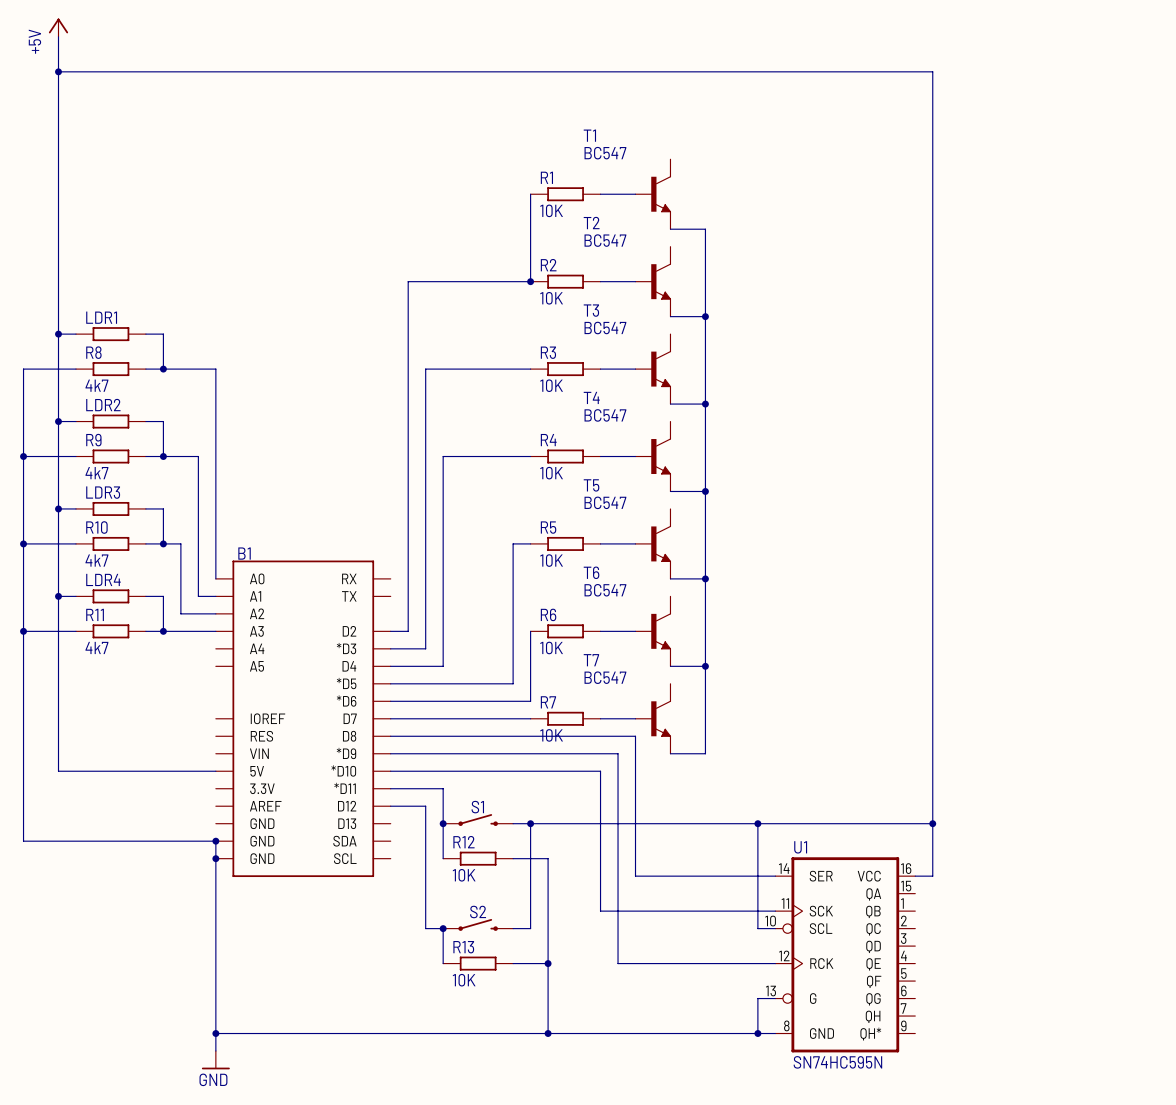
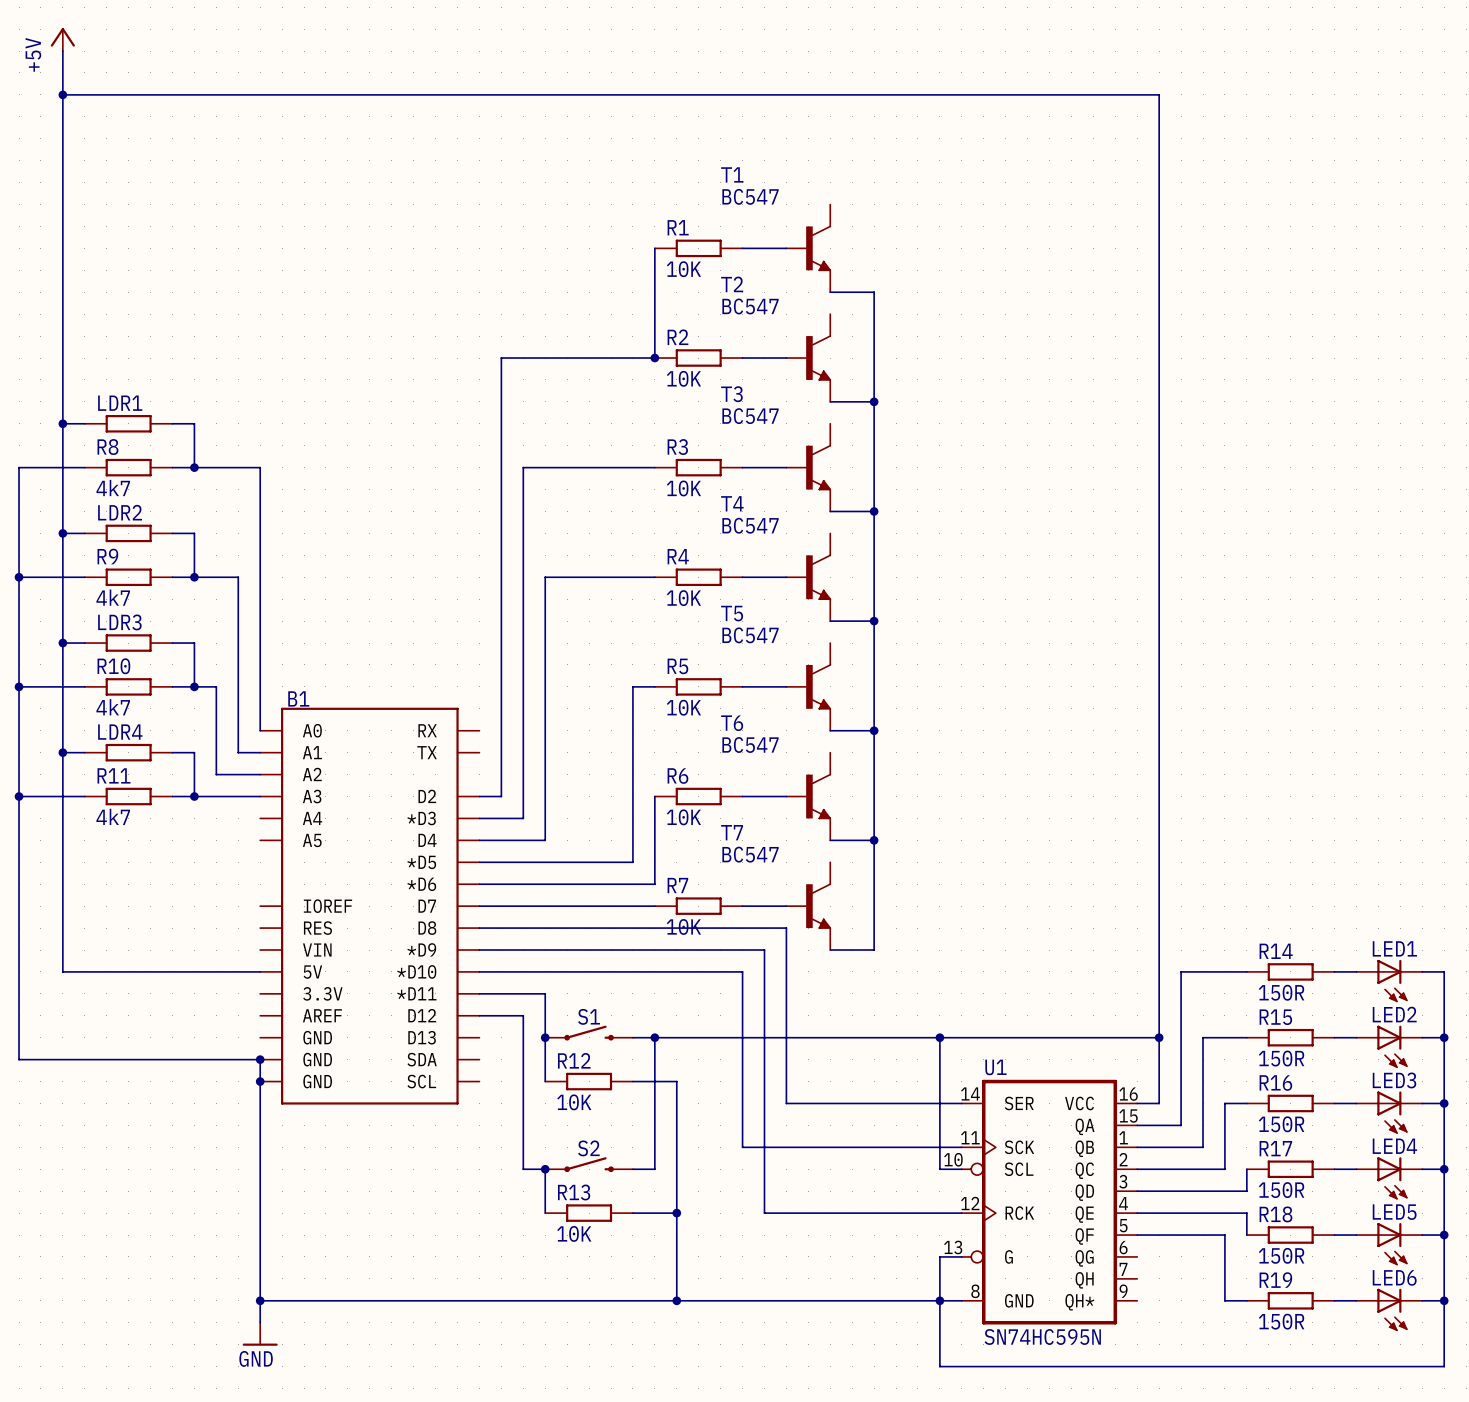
wire: none -> (1246, 971) (1181, 971) (1181, 1125) (1137, 1125)
R14: none -> 150R (1290, 971)
wire: none -> (1334, 971) (1356, 971)
wire: none -> (1422, 971) (1444, 971) (1444, 1366) (939, 1366) (939, 1300)
LED1: none -> (1389, 981)
wire: none -> (1246, 1037) (1203, 1037) (1203, 1147) (1137, 1147)
R15: none -> 150R (1290, 1037)
wire: none -> (1334, 1037) (1356, 1037)
wire: none -> (1422, 1037) (1444, 1037)
junction: none -> (1444, 1037)
LED2: none -> (1389, 1046)
wire: none -> (1246, 1103) (1224, 1103) (1224, 1169) (1137, 1169)
R16: none -> 150R (1290, 1103)
wire: none -> (1334, 1103) (1356, 1103)
wire: none -> (1422, 1103) (1444, 1103)
junction: none -> (1444, 1103)
LED3: none -> (1389, 1112)
wire: none -> (1246, 1169) (1246, 1191) (1137, 1191)
R17: none -> 150R (1290, 1169)
wire: none -> (1334, 1169) (1356, 1169)
wire: none -> (1422, 1169) (1444, 1169)
junction: none -> (1444, 1169)
LED4: none -> (1389, 1178)
wire: none -> (1137, 1213) (1246, 1213) (1246, 1235)
wire: none -> (1137, 1235) (1224, 1235) (1224, 1300) (1246, 1300)
R18: none -> 150R (1290, 1235)
wire: none -> (1334, 1235) (1356, 1235)
wire: none -> (1422, 1235) (1444, 1235)
junction: none -> (1444, 1235)
LED5: none -> (1389, 1244)
R19: none -> 150R (1290, 1300)
wire: none -> (1334, 1300) (1356, 1300)
wire: none -> (1422, 1300) (1444, 1300)
junction: none -> (1444, 1300)
LED6: none -> (1389, 1309)

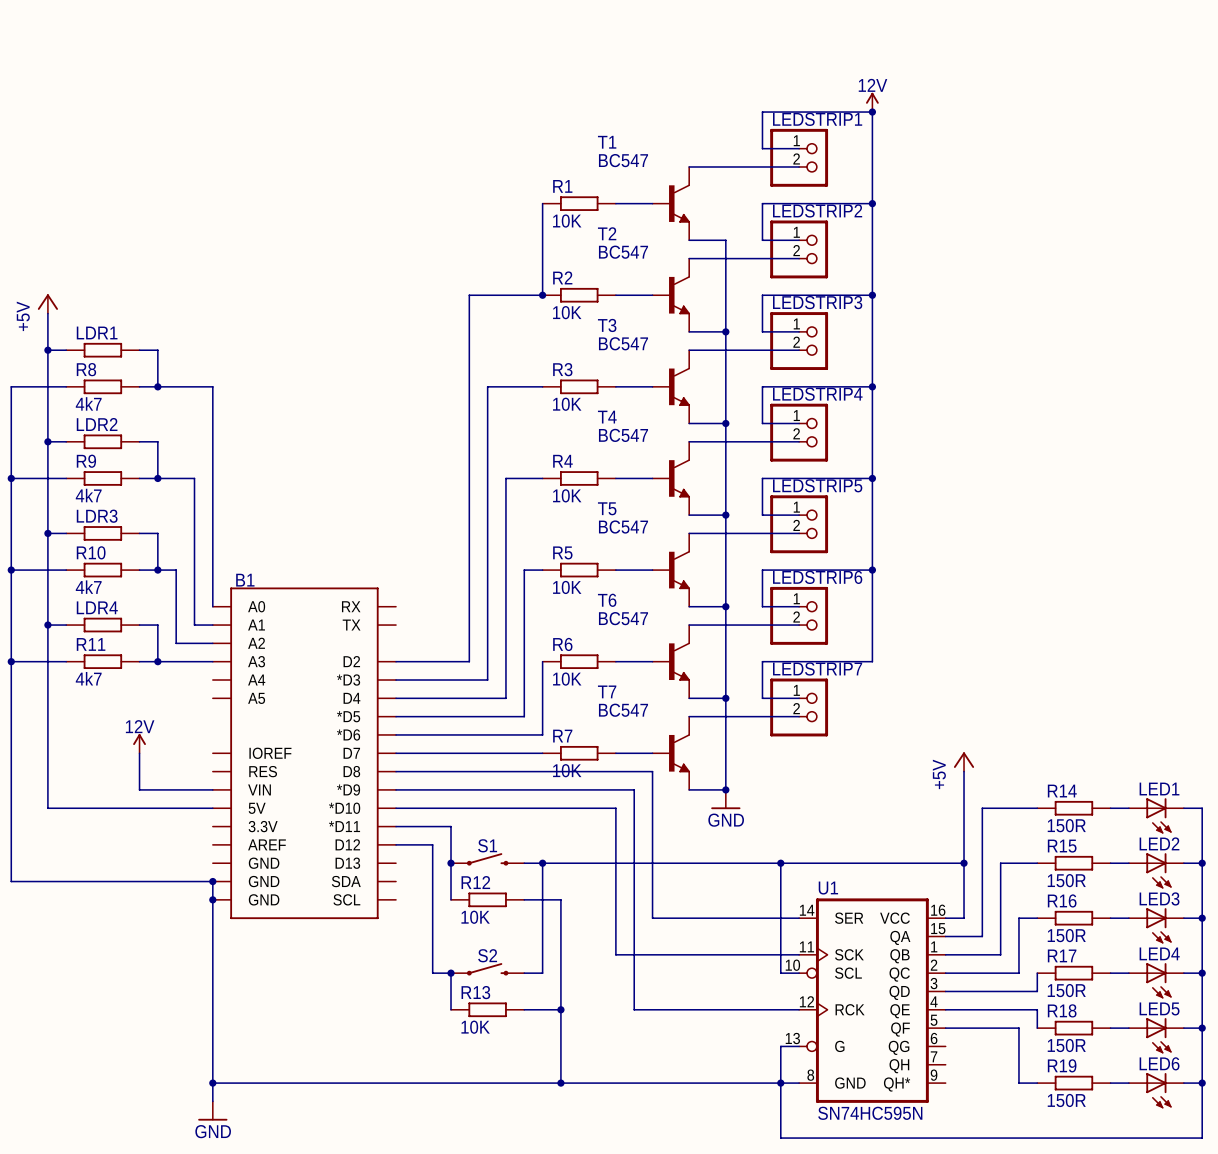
power symbol: +5V (62, 39) -> none
wire: (62, 51) (62, 379) -> none
wire: (62, 94) (1159, 94) (1159, 928) -> none
junction: (62, 94) -> none
power symbol: none -> 12V (872, 102)
junction: none -> (872, 112)
wire: none -> (799, 148) (762, 148) (762, 112) (872, 112) (872, 661) (762, 661) (762, 698) (799, 698)
LEDSTRIP1: none -> (799, 157)
wire: none -> (689, 166) (799, 166)
wire: none -> (872, 203) (762, 203) (762, 240) (799, 240)
junction: none -> (872, 203)
LEDSTRIP2: none -> (799, 249)
wire: none -> (689, 258) (799, 258)
wire: (567, 358) (501, 358) (501, 796) -> (469, 295) (469, 661) (414, 661)
wire: none -> (872, 295) (762, 295) (762, 331) (799, 331)
junction: none -> (872, 295)
power symbol: none -> +5V (47, 303)
LEDSTRIP3: none -> (799, 341)
wire: none -> (689, 350) (799, 350)
wire: (589, 467) (523, 467) (523, 818) -> (487, 386) (487, 680) (432, 680)
wire: none -> (872, 386) (762, 386) (762, 423) (799, 423)
junction: none -> (872, 386)
LEDSTRIP4: none -> (799, 432)
wire: none -> (689, 441) (799, 441)
wire: (611, 577) (545, 577) (545, 840) -> (505, 478) (505, 698) (451, 698)
wire: none -> (872, 478) (762, 478) (762, 515) (799, 515)
junction: none -> (872, 478)
LEDSTRIP5: none -> (799, 524)
wire: none -> (689, 533) (799, 533)
wire: none -> (872, 570) (762, 570) (762, 606) (799, 606)
junction: none -> (872, 570)
LEDSTRIP6: none -> (799, 615)
wire: none -> (689, 625) (799, 625)
LEDSTRIP7: none -> (799, 707)
wire: none -> (689, 716) (799, 716)
power symbol: none -> 12V (139, 743)
wire: none -> (139, 753) (139, 789) (212, 789)
power symbol: none -> +5V (964, 761)
junction: none -> (725, 789)
power symbol: none -> GND (725, 799)

